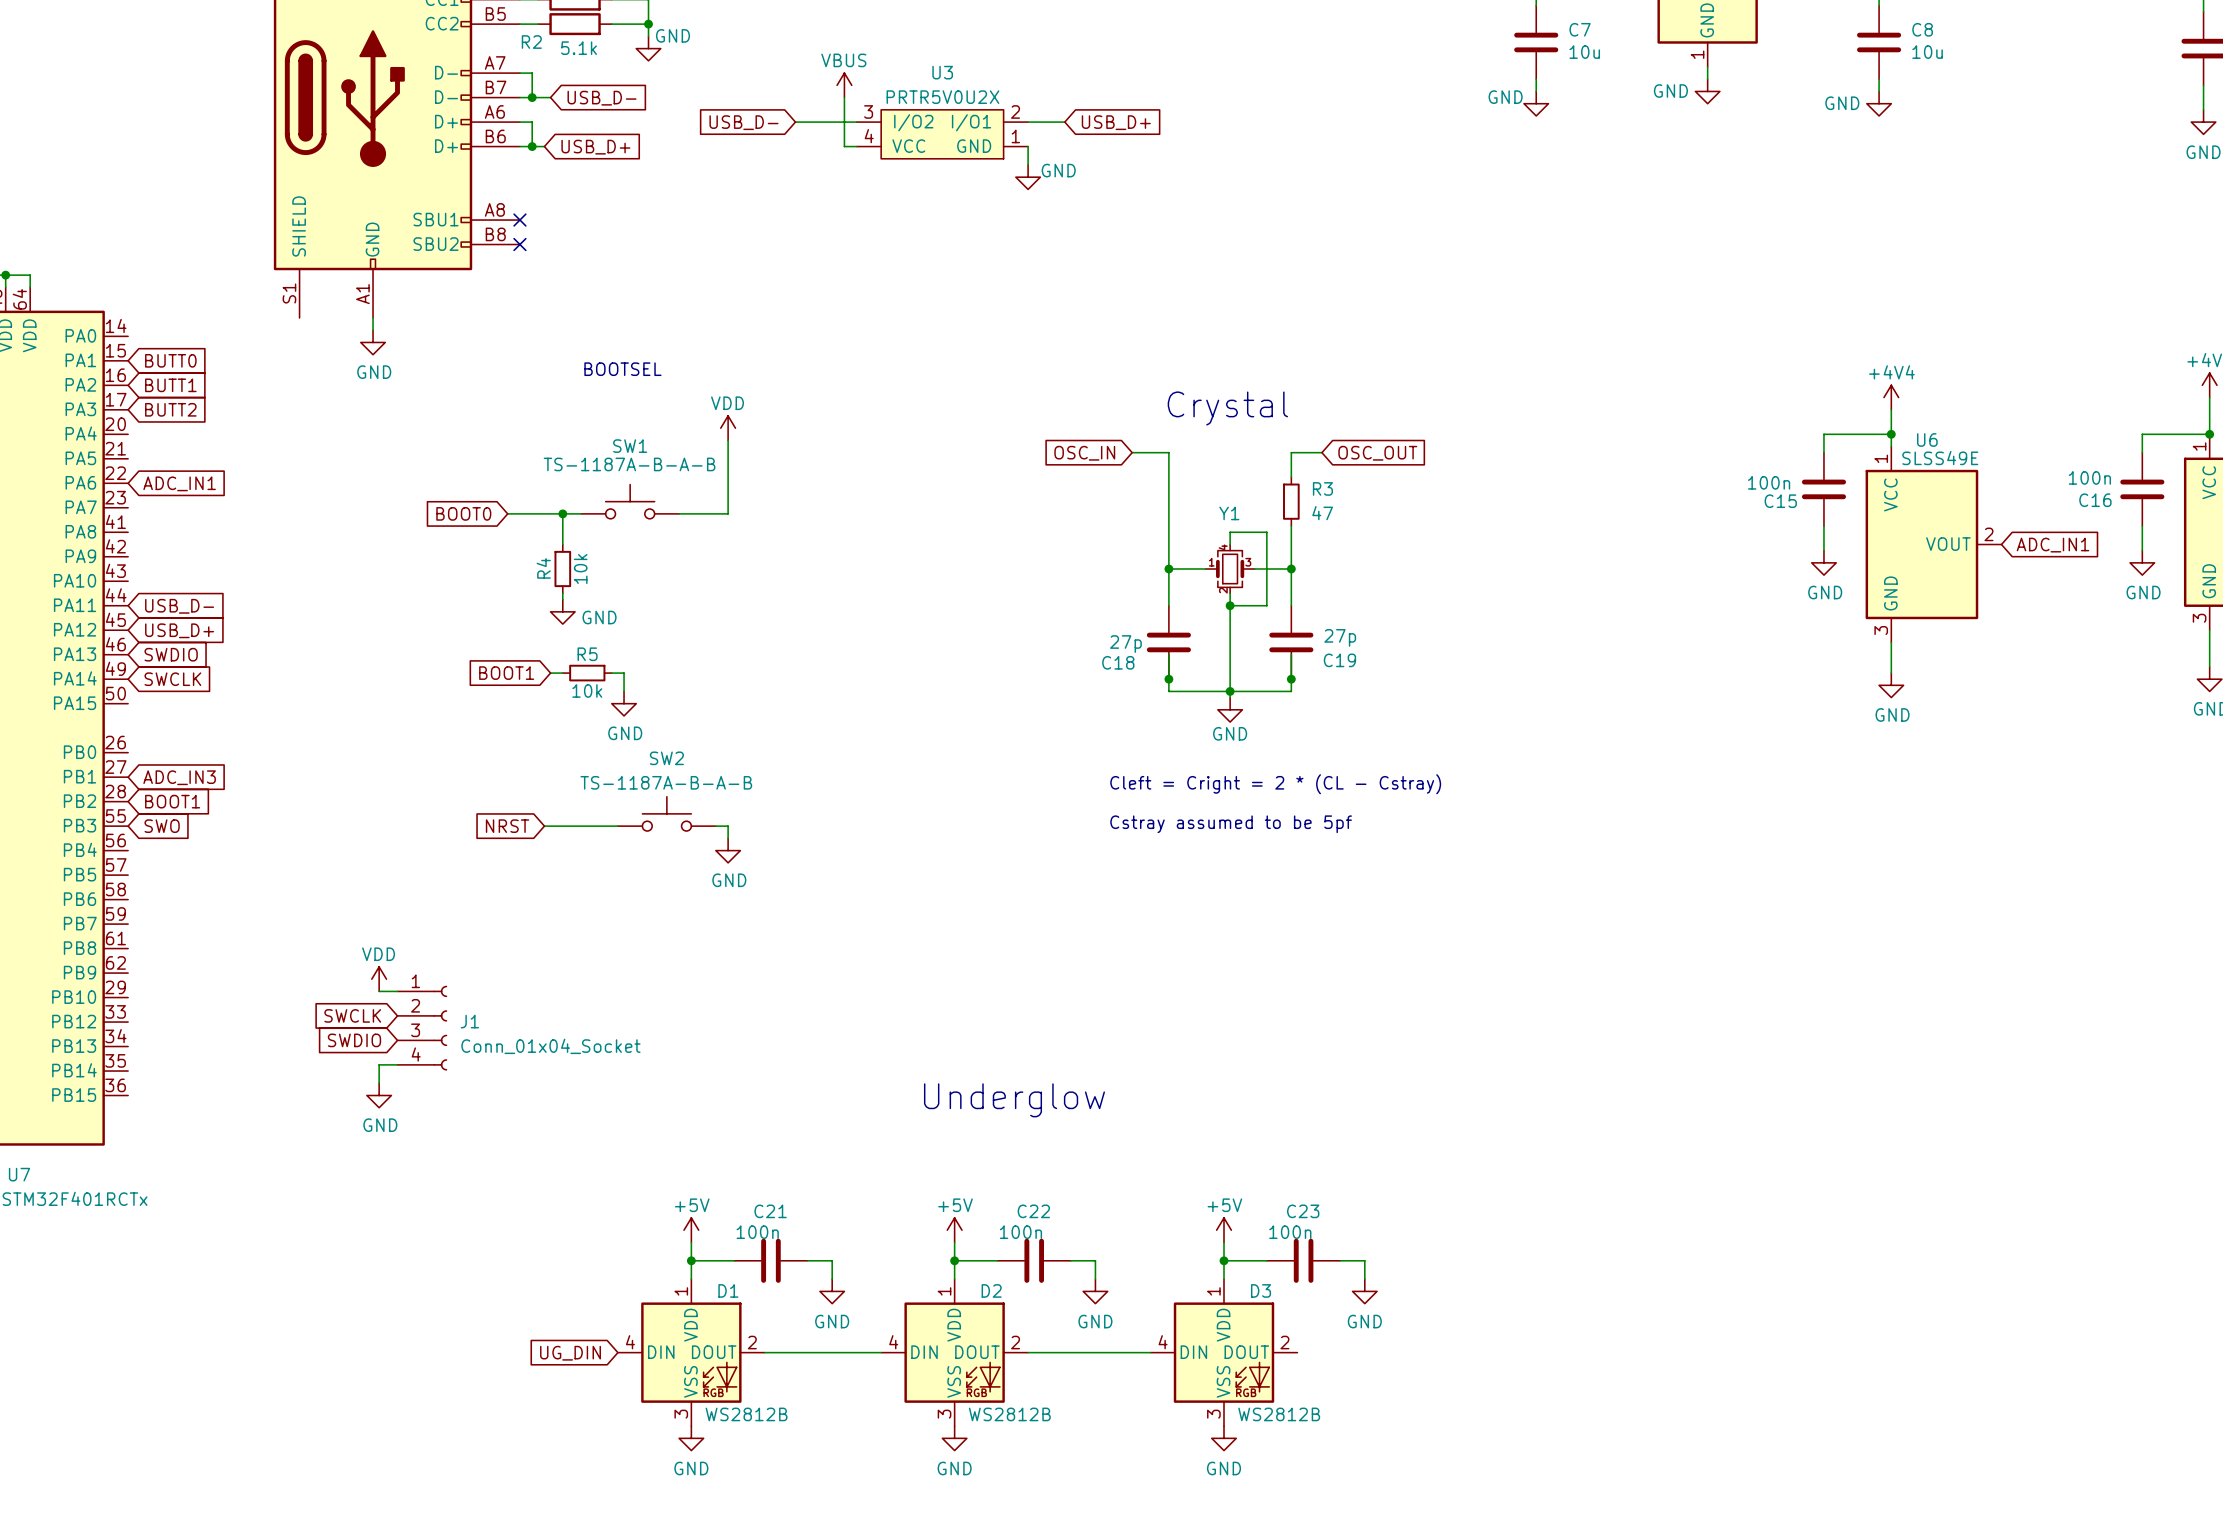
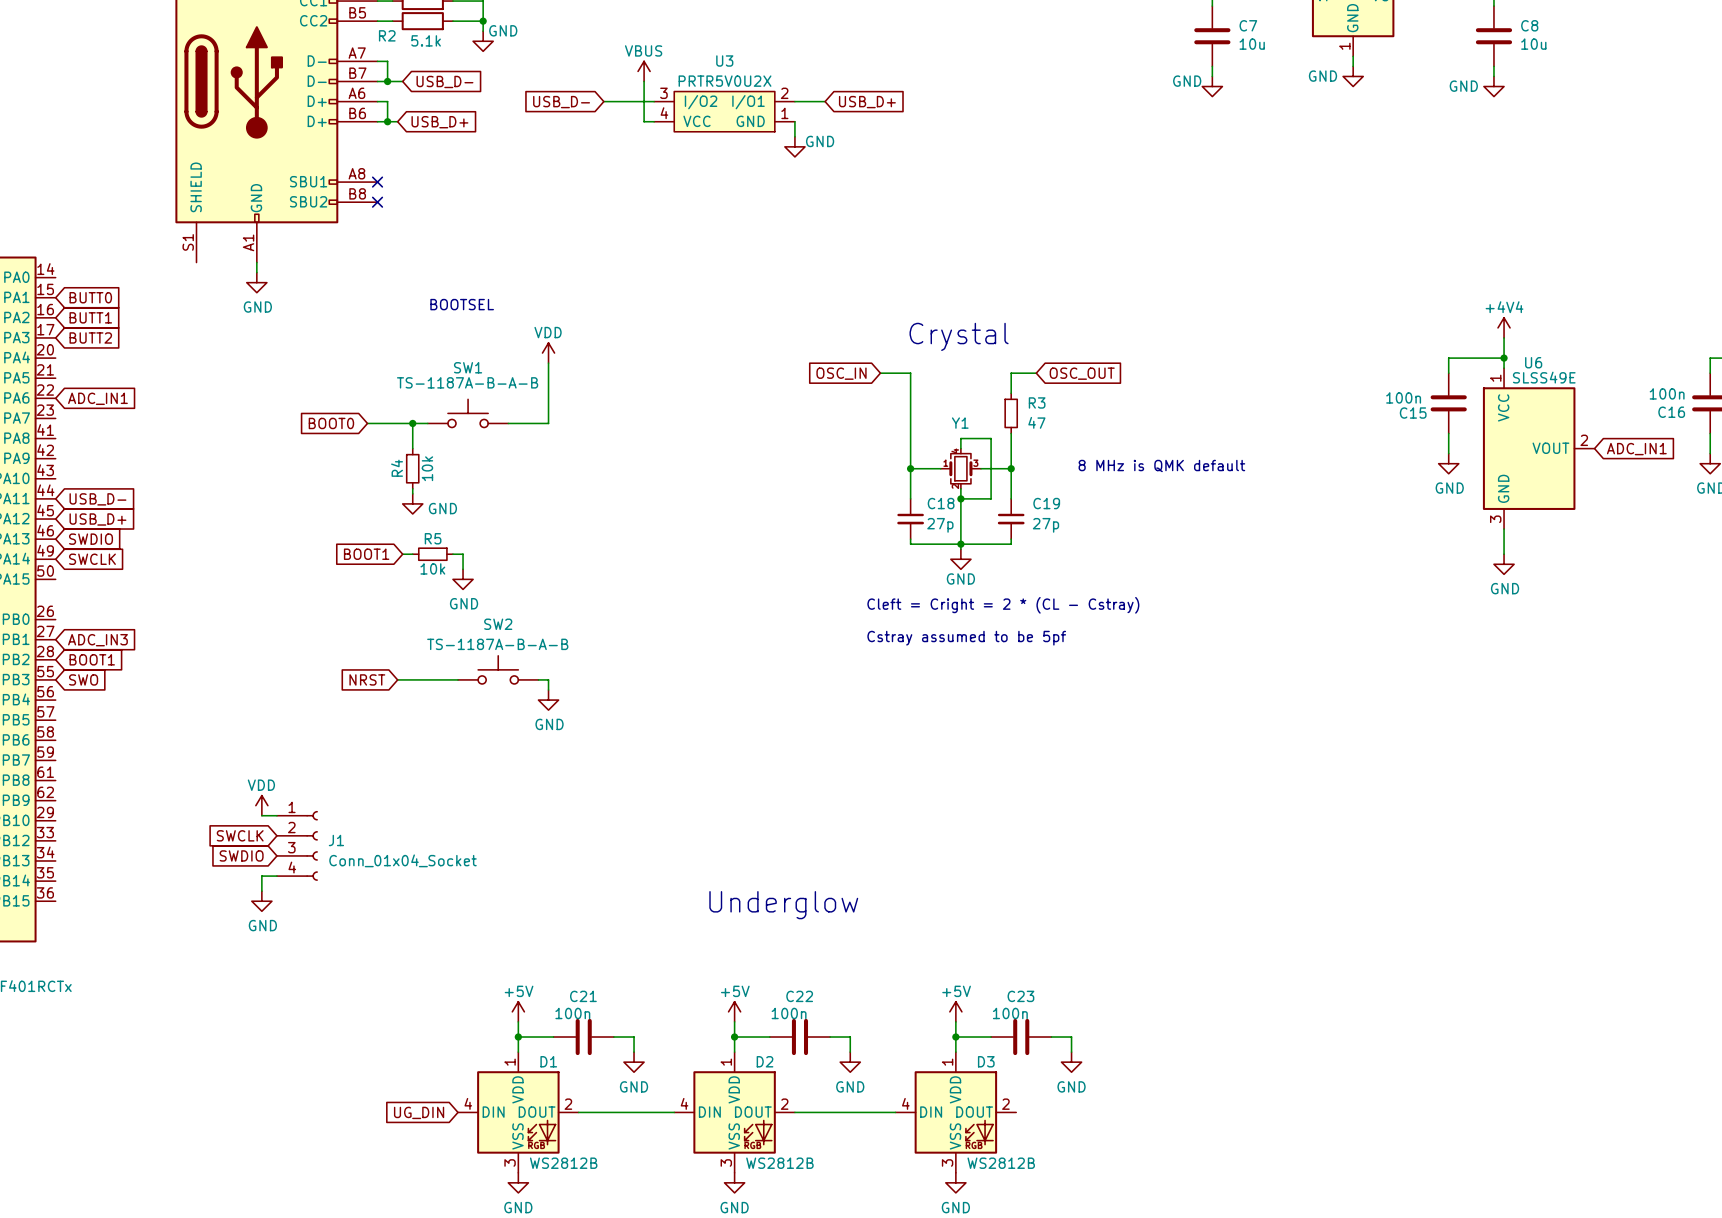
text: none -> 8 MHz is QMK default (1161, 465)
C18 symbol: [1146, 605, 1191, 680] -> [897, 498, 924, 540]
C19 symbol: [1269, 605, 1314, 680] -> [997, 498, 1025, 540]
C18 value position: 27p (1125, 644) -> 27p (940, 525)
wire: (1168, 660) (1168, 691) (1291, 691) (1291, 660) -> (910, 544) (1011, 544)
C19 name position: C19 (1339, 660) -> C19 (1046, 503)
C18 name position: C18 (1118, 662) -> C18 (941, 503)
wire: (1230, 666) (1230, 697) -> none
junction: (1168, 679) -> none
junction: (1291, 679) -> none
junction position: (1230, 691) -> (960, 544)
power symbol position: GND (1230, 709) -> GND (960, 559)
text position: Cleft = Cright = 2 * (CL - Cstray) (1275, 784) -> Cleft = Cright = 2 * (CL - Cstray) (1003, 605)
text position: Cstray assumed to be 5pf (1231, 824) -> Cstray assumed to be 5pf (966, 638)

